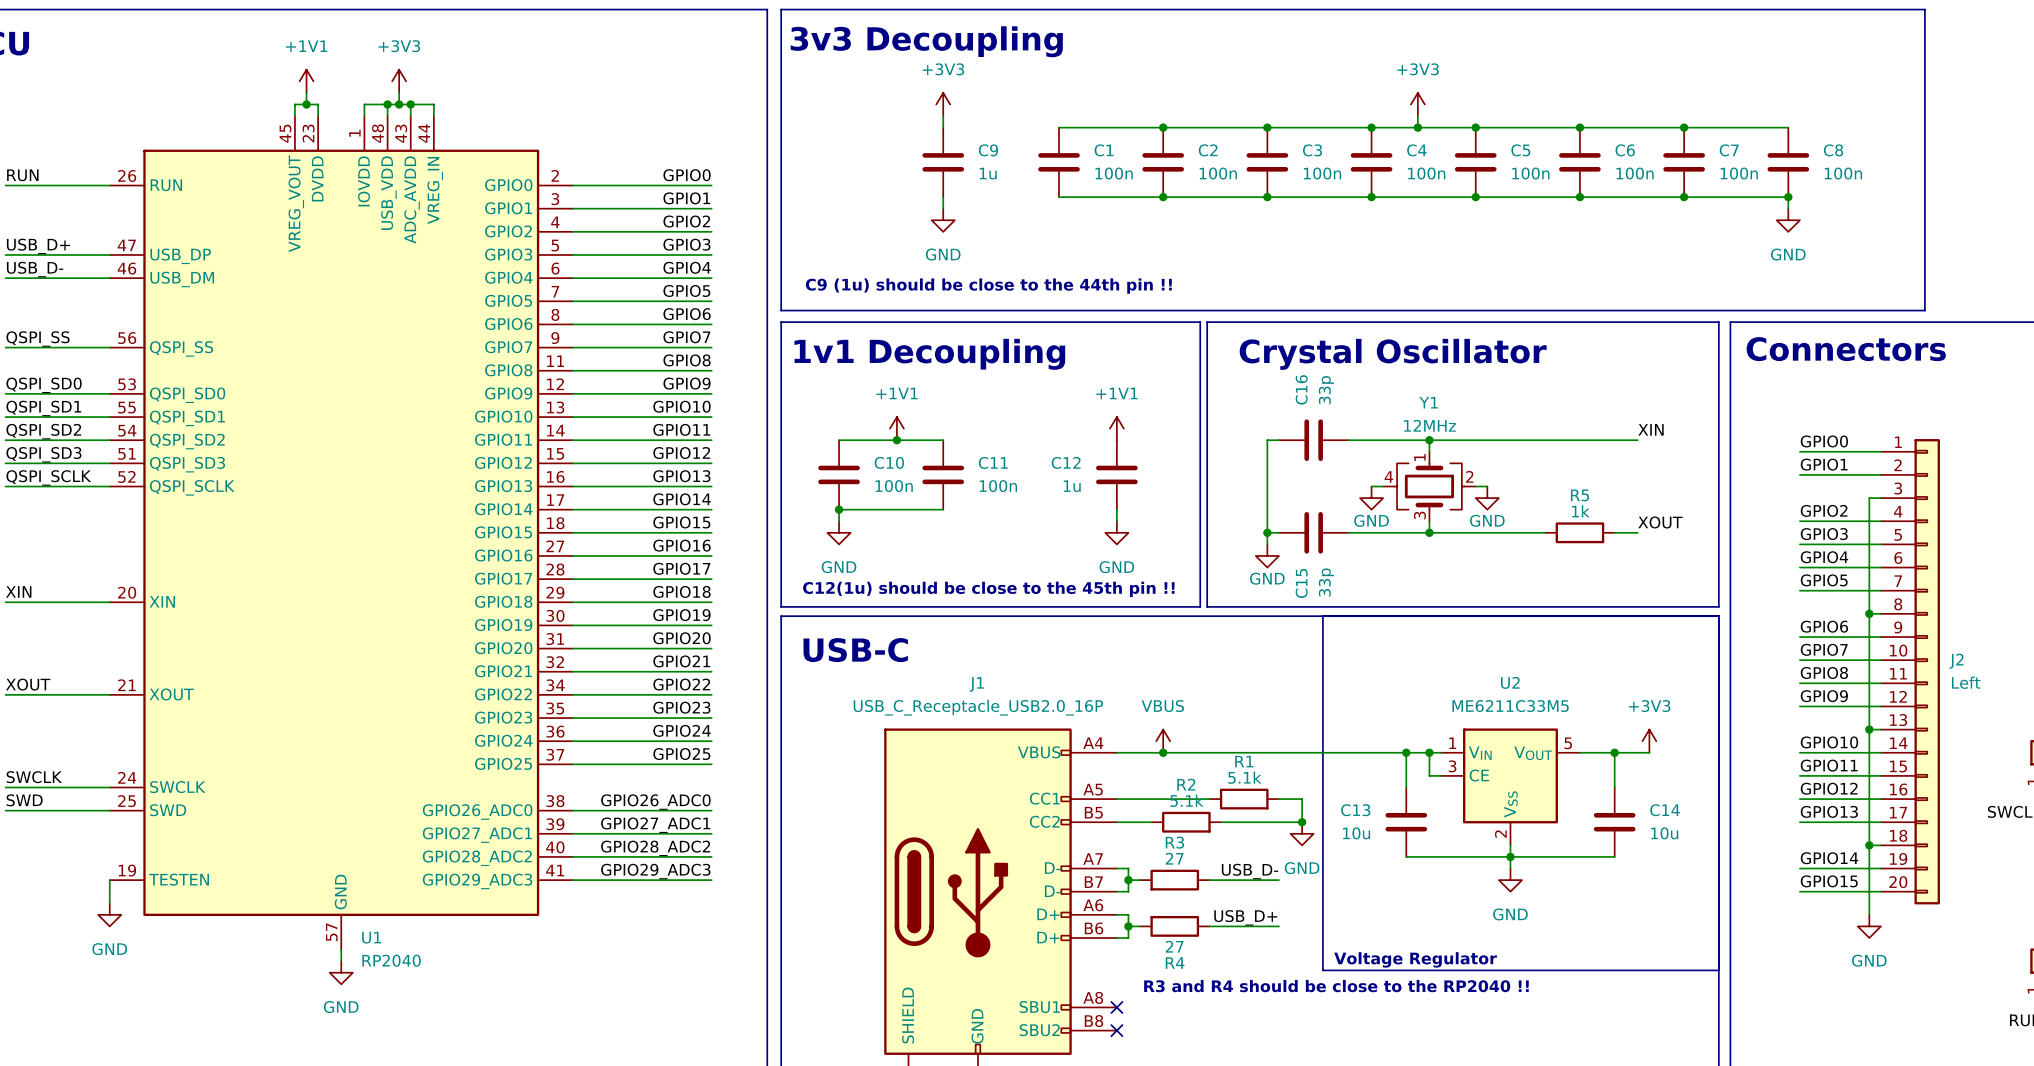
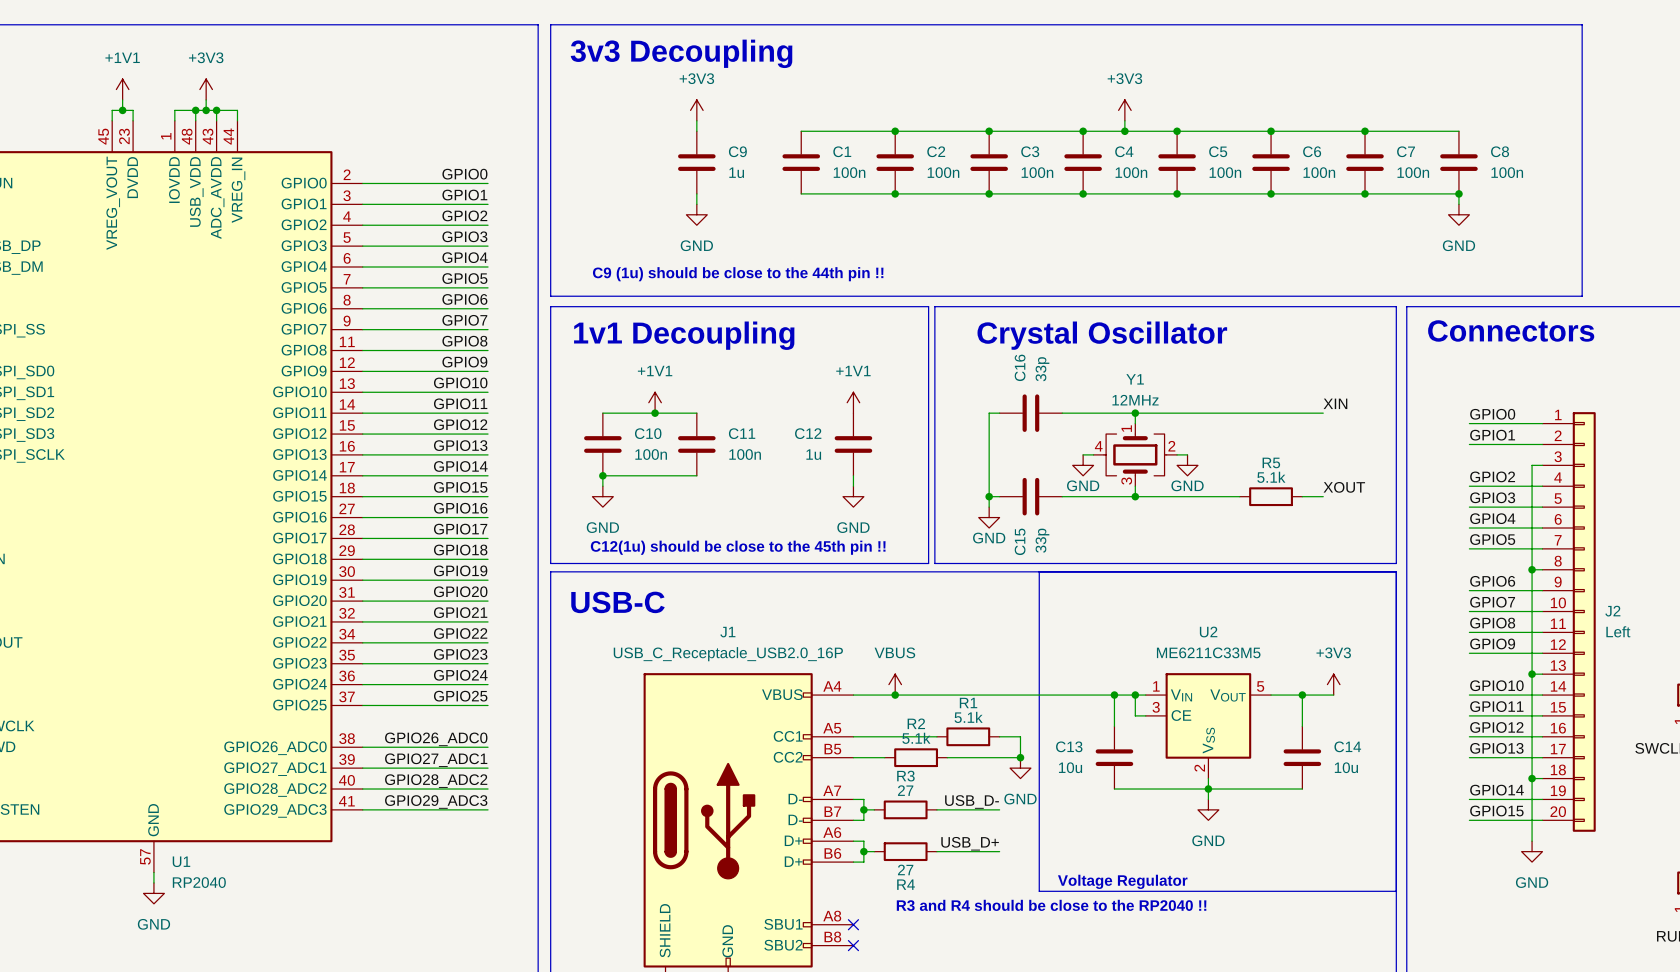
R5 value: 1k (1580, 511) -> 5.1k (1271, 477)

